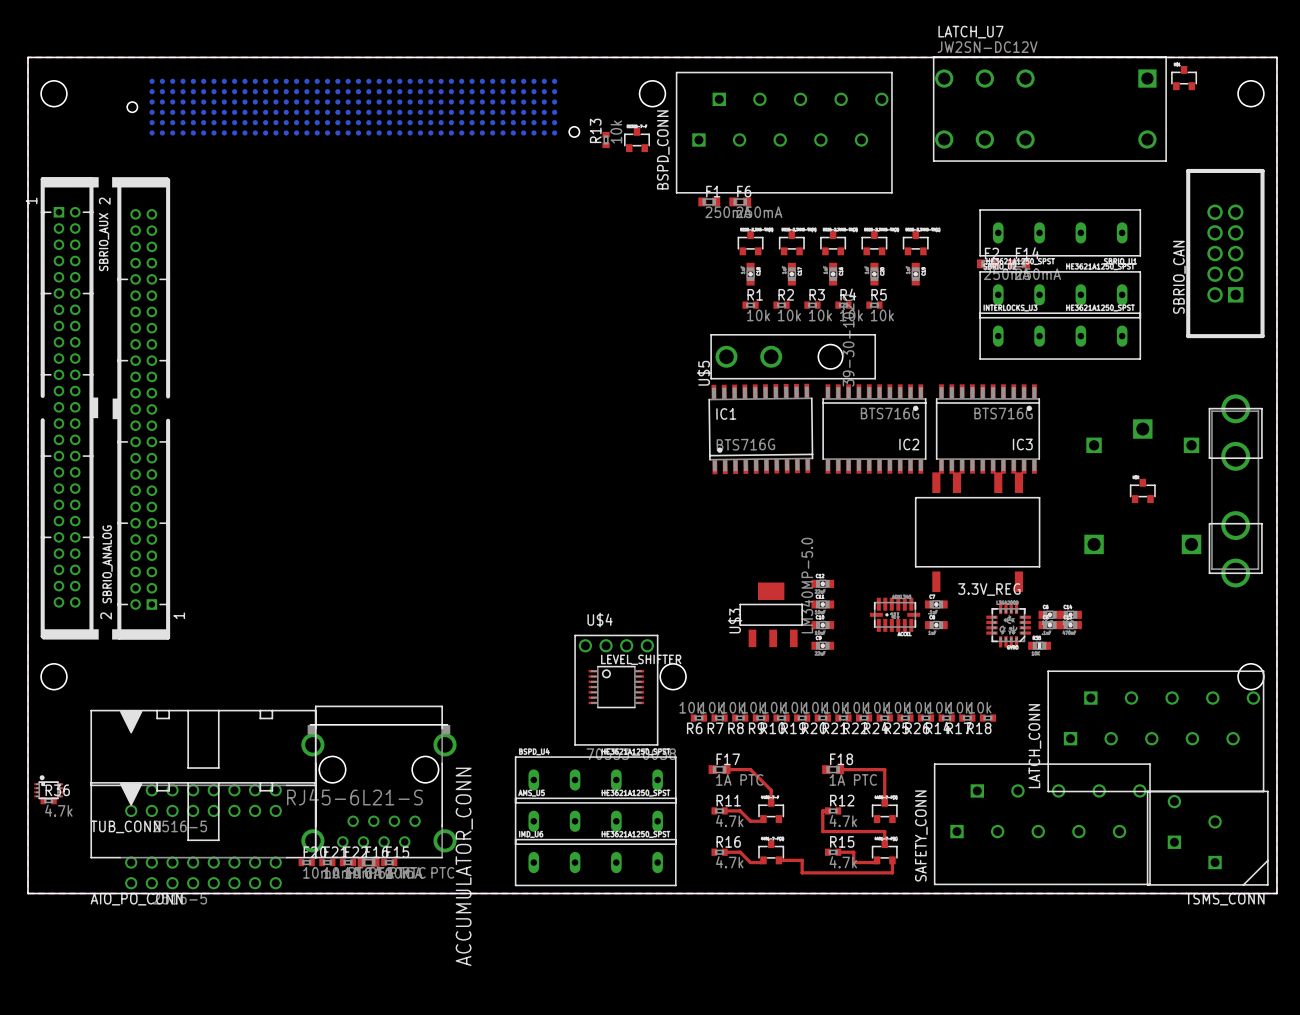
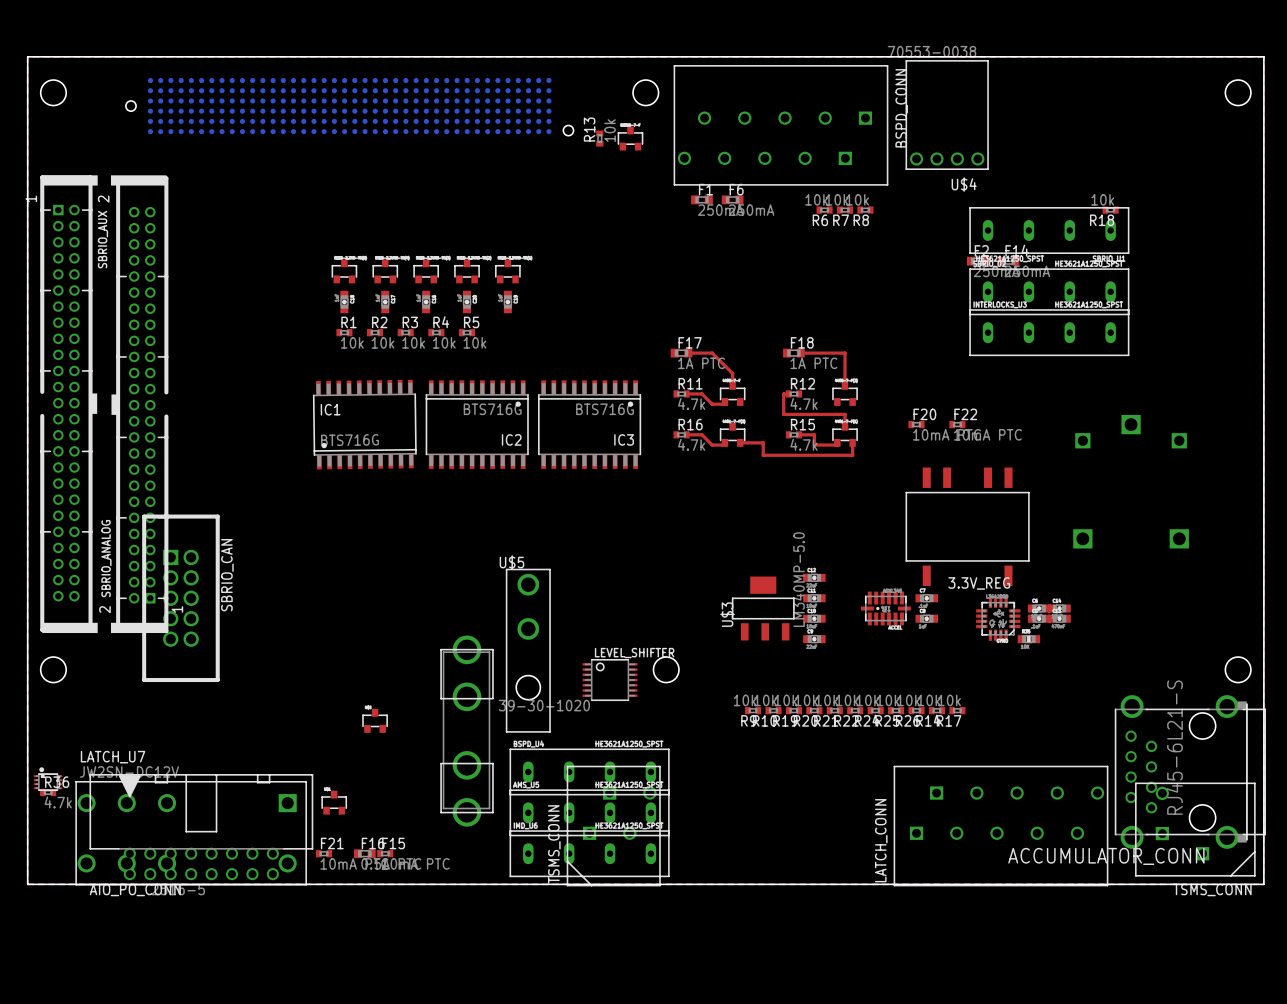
part position: (1184, 78) -> (334, 802)
LATCH_U7 position: (1049, 109) -> (191, 833)
BSPD_CONN rotation: 0° (784, 132) -> 180° (780, 125)
part position: (750, 243) -> (344, 271)
part position: (791, 243) -> (385, 271)
part position: (833, 243) -> (426, 271)
part position: (874, 243) -> (467, 271)
part position: (915, 243) -> (507, 271)
SBRIO_CAN: (1225, 253) -> none
part position: (750, 274) -> (344, 302)
part position: (791, 274) -> (385, 302)
part position: (833, 274) -> (426, 302)
part position: (874, 274) -> (467, 302)
part position: (915, 274) -> (507, 302)
R1 position: (750, 305) -> (344, 332)
R2 position: (781, 305) -> (375, 332)
R3 position: (812, 305) -> (405, 332)
R4 position: (843, 305) -> (436, 332)
R5 position: (874, 305) -> (467, 332)
top track: none -> (688, 353) (712, 353) (732, 373) (732, 385)
U$5 rotation: 0° (793, 356) -> 90° clockwise (528, 650)
U$5 position: (793, 356) -> (528, 650)
top track: none -> (800, 353) (845, 353) (845, 385)
top track: none -> (686, 393) (701, 393) (712, 404) (722, 404) (724, 402) (724, 404)
top track: none -> (788, 393) (783, 393) (783, 414) (845, 414) (845, 426)
IC1 position: (760, 429) -> (364, 424)
IC2 position: (874, 429) -> (477, 424)
IC3 position: (987, 429) -> (589, 424)
top track: none -> (686, 434) (701, 434) (712, 445) (722, 445) (724, 442) (724, 445)
top track: none -> (799, 434) (814, 434) (814, 445) (837, 445) (837, 442)
top track: none -> (740, 442) (763, 442) (763, 455) (852, 455) (852, 442)
part position: (1142, 490) -> (375, 720)
part: (1235, 490) -> none
SBRIO_CAN: none -> (180, 598)
U$4 rotation: 0° (616, 690) -> 180° (947, 115)
U$4 position: (616, 690) -> (947, 115)
R6 position: (698, 718) -> (824, 210)
R7 position: (719, 718) -> (845, 210)
R8 position: (740, 718) -> (865, 210)
R18 position: (987, 718) -> (1110, 210)
LATCH_CONN position: (1155, 731) -> (1001, 826)
part: none -> (467, 731)
TUB_CONN: 2516-5 (203, 763) -> none
F17 position: (719, 769) -> (681, 353)
top track: (726, 769) (750, 769) (771, 790) (771, 802) -> none
F18 position: (833, 769) -> (793, 353)
top track: (840, 769) (884, 769) (884, 802) -> none
ACCUMULATOR_CONN: none -> RJ45-6L21-S (1190, 771)
ACCUMULATOR_CONN: RJ45-6L21-S (378, 781) -> none
R11 position: (719, 810) -> (681, 393)
top track: (724, 810) (740, 810) (750, 821) (761, 821) (763, 819) (763, 821) -> none
part position: (771, 810) -> (732, 393)
top track: (827, 810) (822, 810) (822, 831) (884, 831) (884, 844) -> none
R12 position: (833, 810) -> (793, 393)
part position: (884, 810) -> (845, 393)
SAFETY_CONN: (1042, 824) -> none
TSMS_CONN: none -> (613, 826)
R16 position: (719, 852) -> (681, 434)
top track: (724, 852) (740, 852) (750, 862) (761, 862) (763, 860) (763, 862) -> none
part position: (771, 852) -> (732, 434)
R15 position: (833, 852) -> (793, 434)
top track: (838, 852) (853, 852) (853, 862) (877, 862) (877, 860) -> none
part position: (884, 852) -> (845, 434)
top track: (778, 860) (802, 860) (802, 872) (892, 872) (892, 860) -> none
F20 position: (306, 862) -> (916, 424)
F22 position: (347, 862) -> (957, 424)

